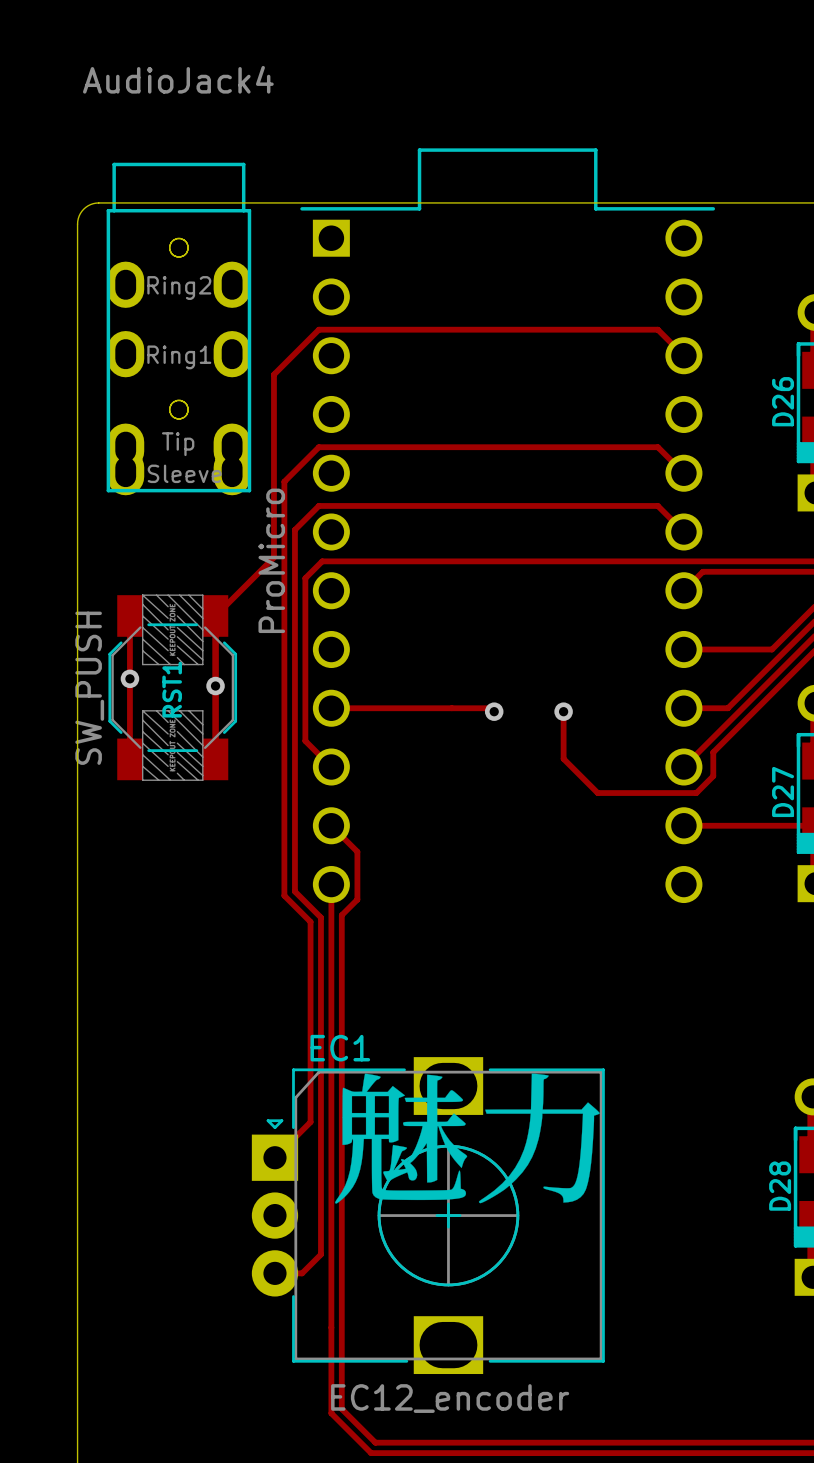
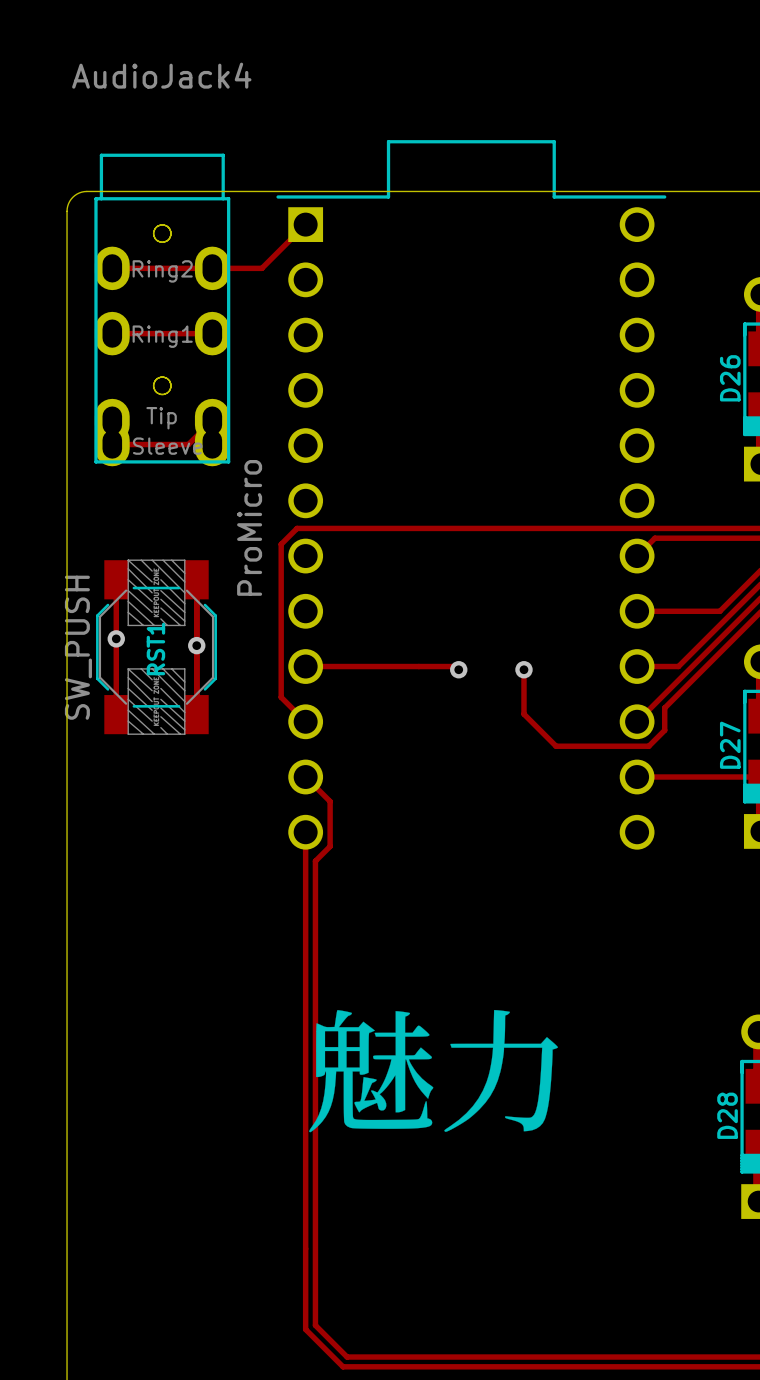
track: none -> (305, 224) (261, 268) (112, 268)
track: none -> (112, 333) (212, 333)
track: (683, 355) (657, 329) (318, 329) (273, 374) (273, 557) (215, 615) -> none
track: none -> (212, 420) (188, 444) (112, 444)
track: (683, 473) (657, 447) (318, 447) (284, 481) (284, 895) (310, 921) (310, 1122) (274, 1157) -> none
track: (683, 531) (657, 505) (318, 505) (294, 529) (294, 891) (320, 917) (320, 1254) (302, 1273) (274, 1273) -> none
EC1: EC12_encoder (428, 1215) -> none

